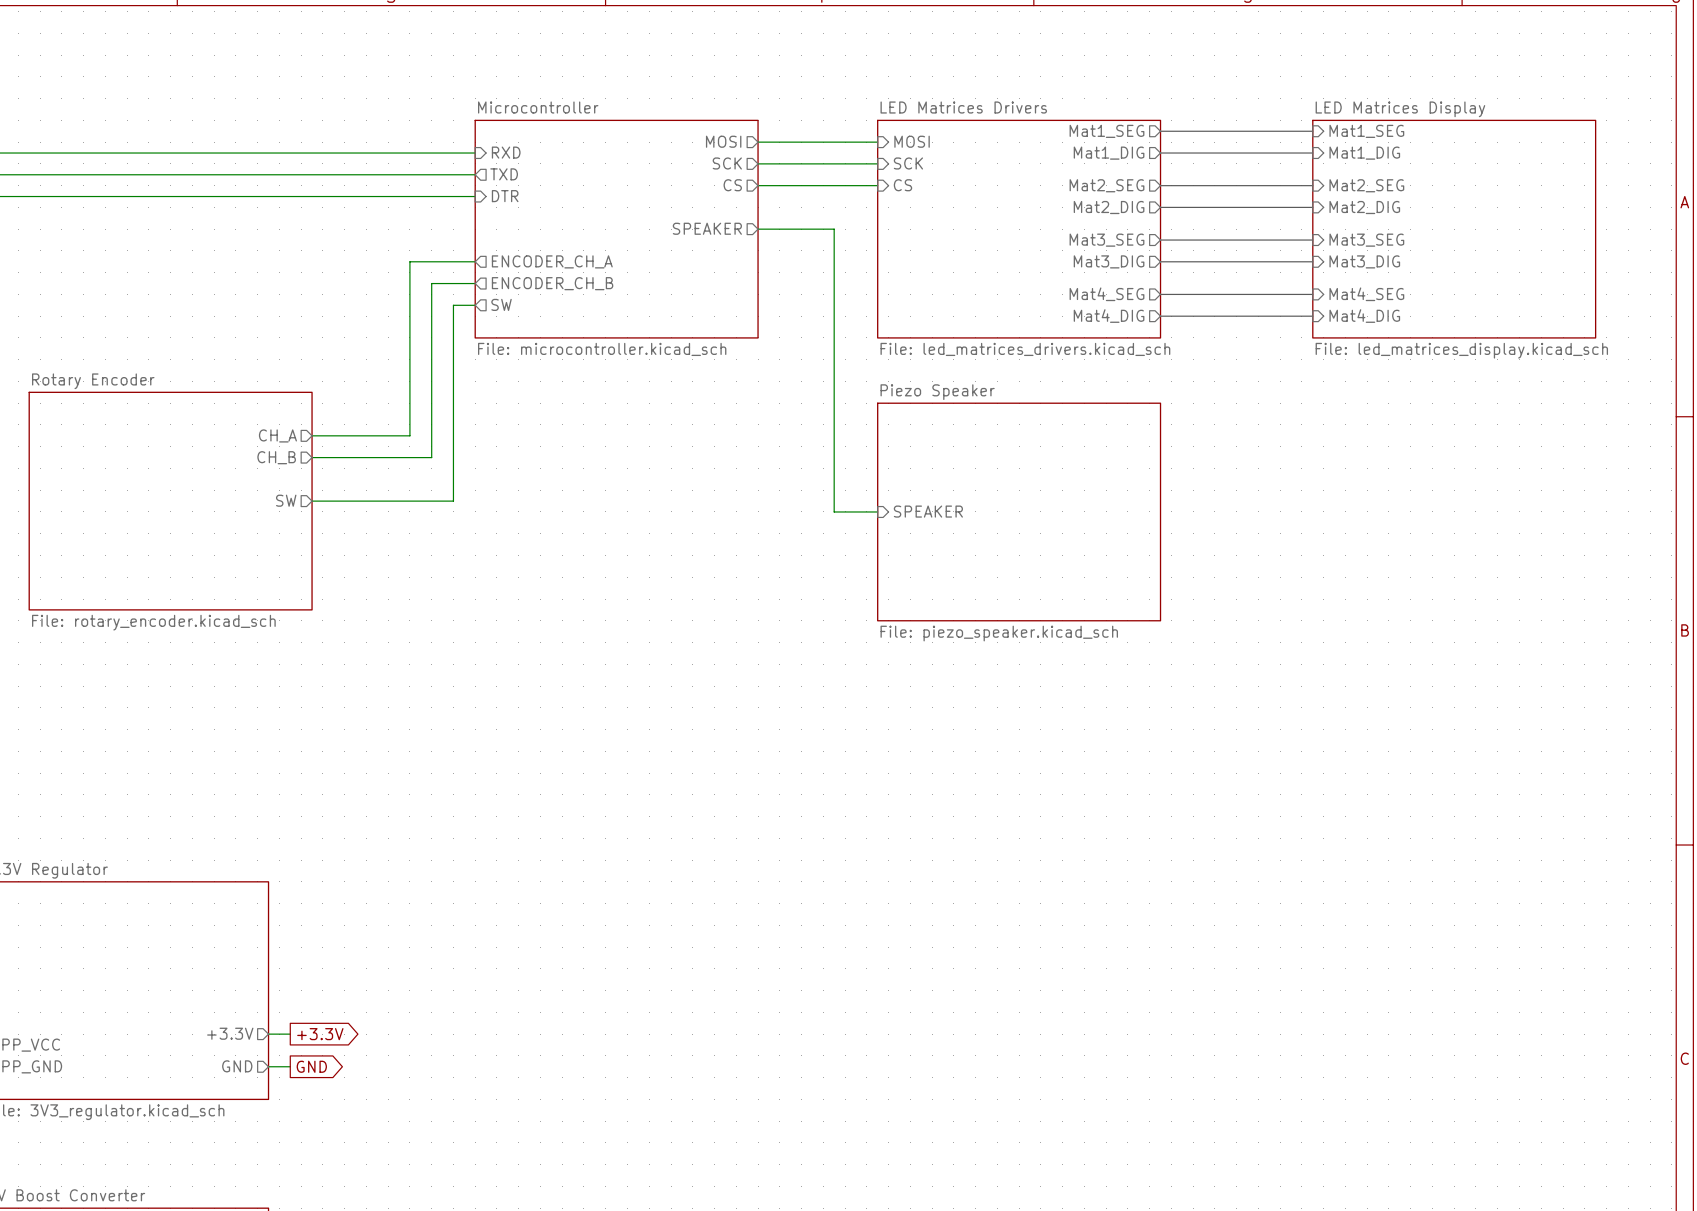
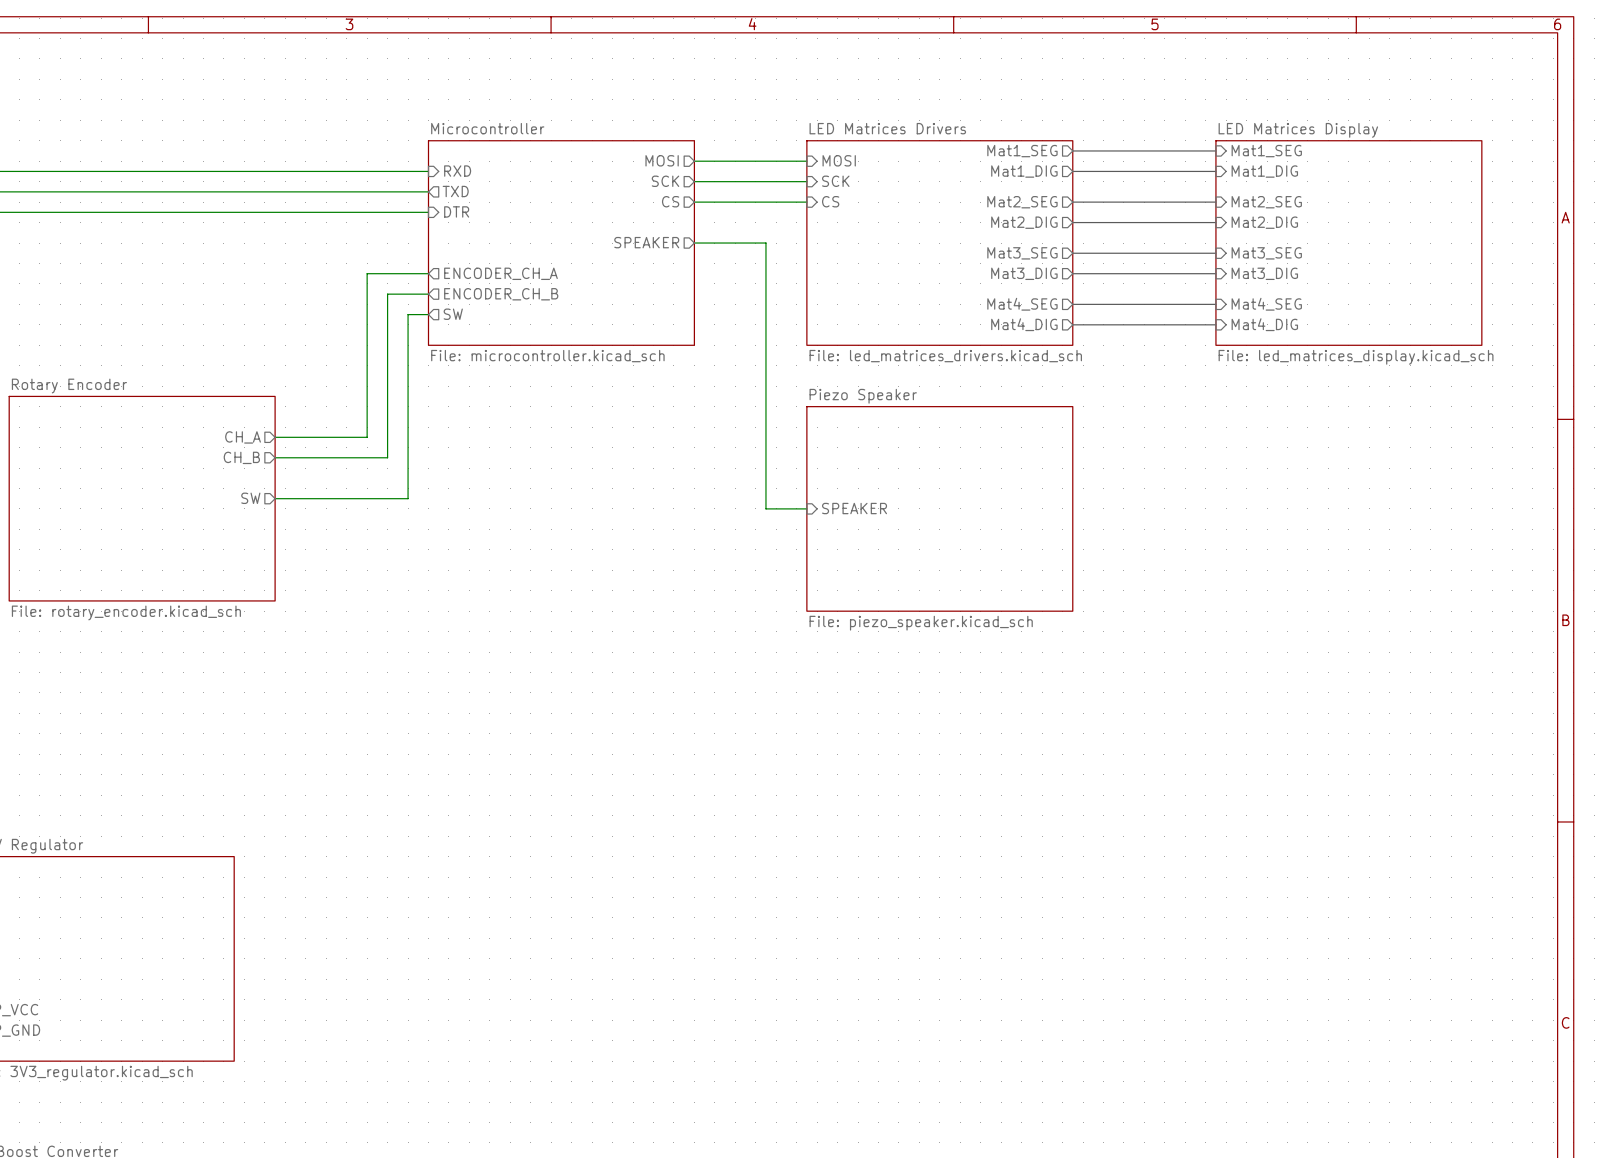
sheet pin: +3.3V (230, 1033) -> none
wire: (268, 1034) (290, 1034) -> none
global label: +3.3V (320, 1034) -> none
sheet pin: GND (237, 1066) -> none
wire: (268, 1066) (290, 1066) -> none
global label: GND (311, 1066) -> none

